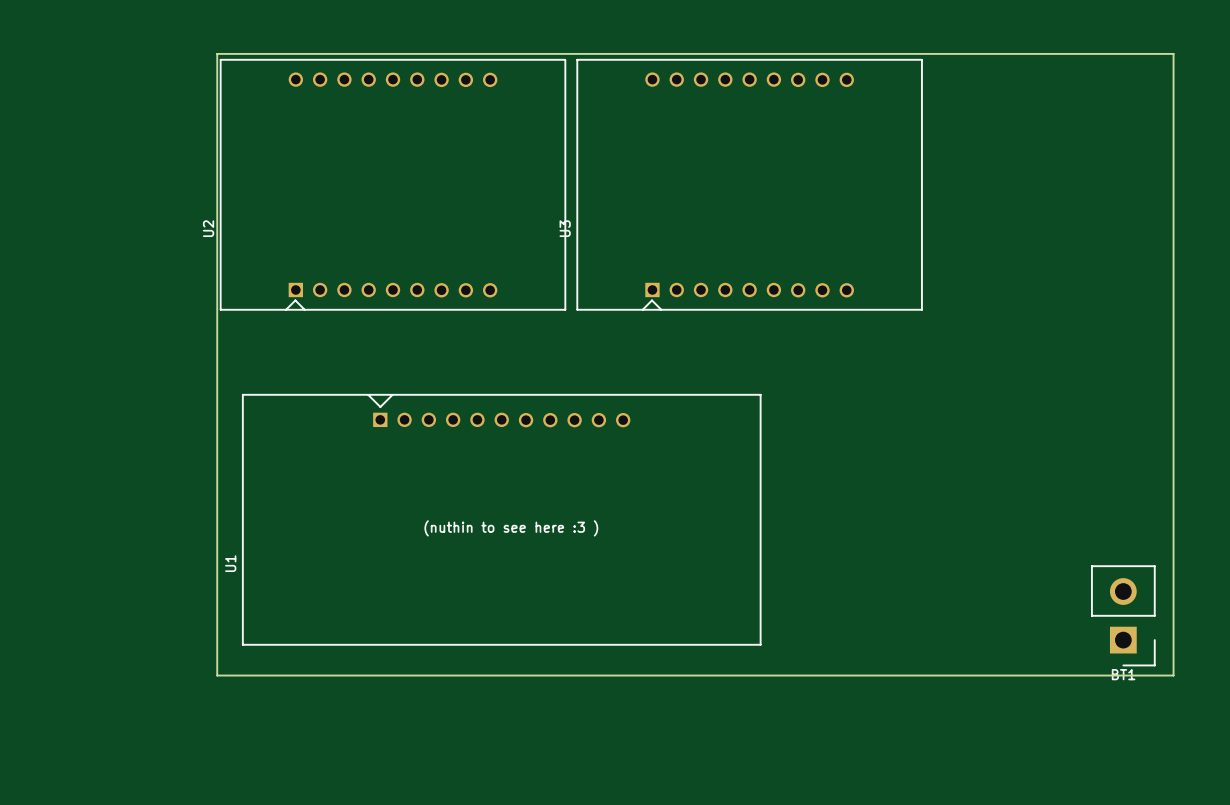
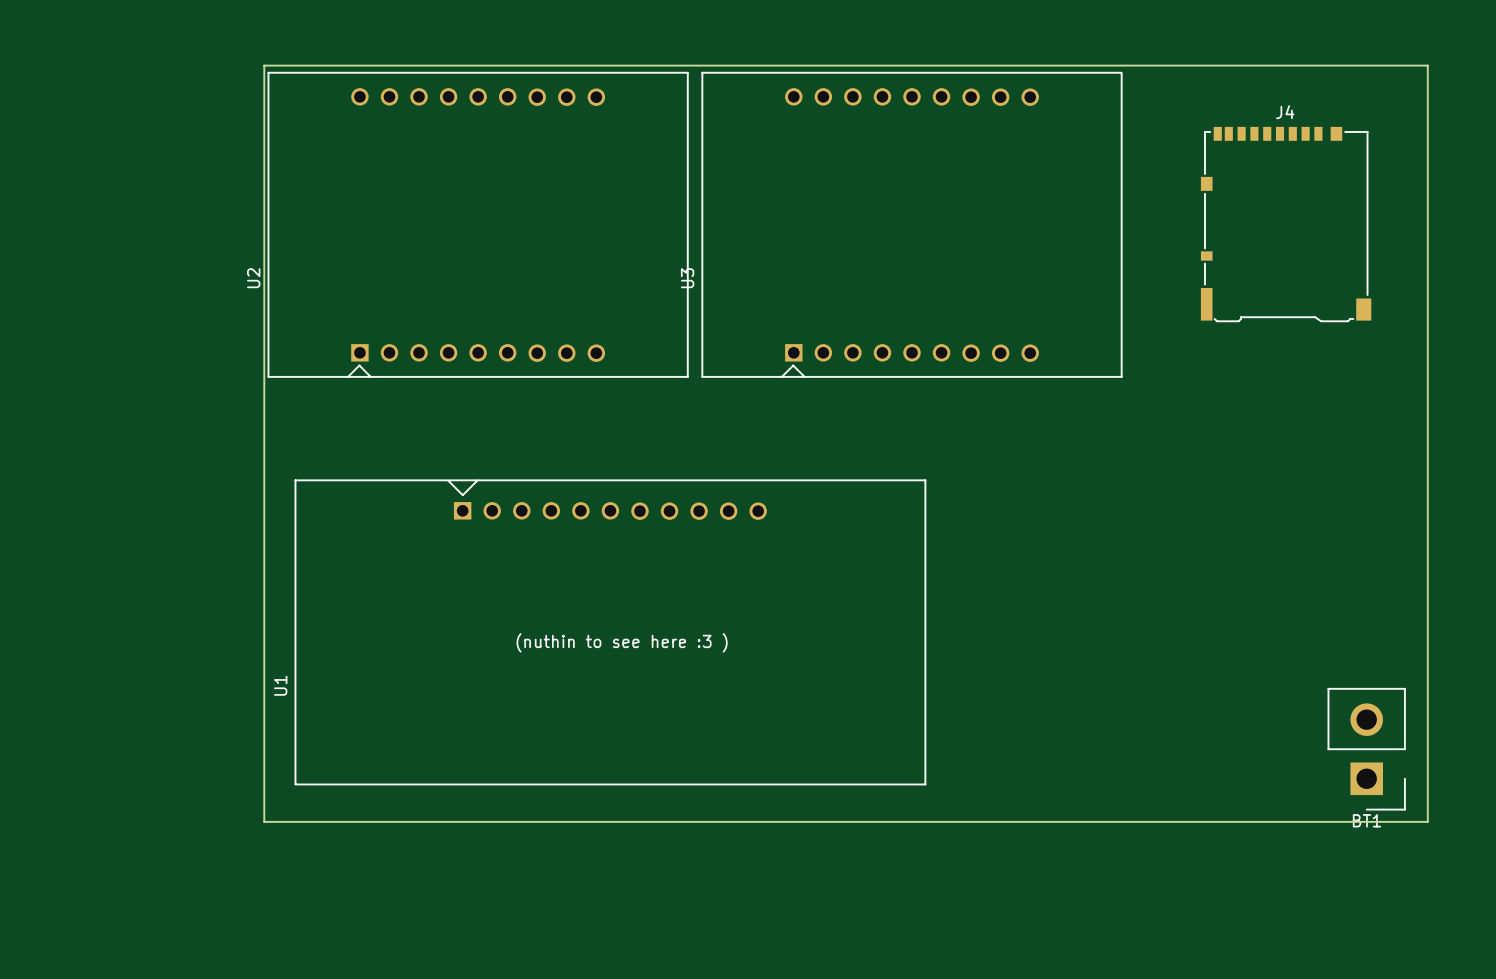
J4: none -> (1286, 224)

